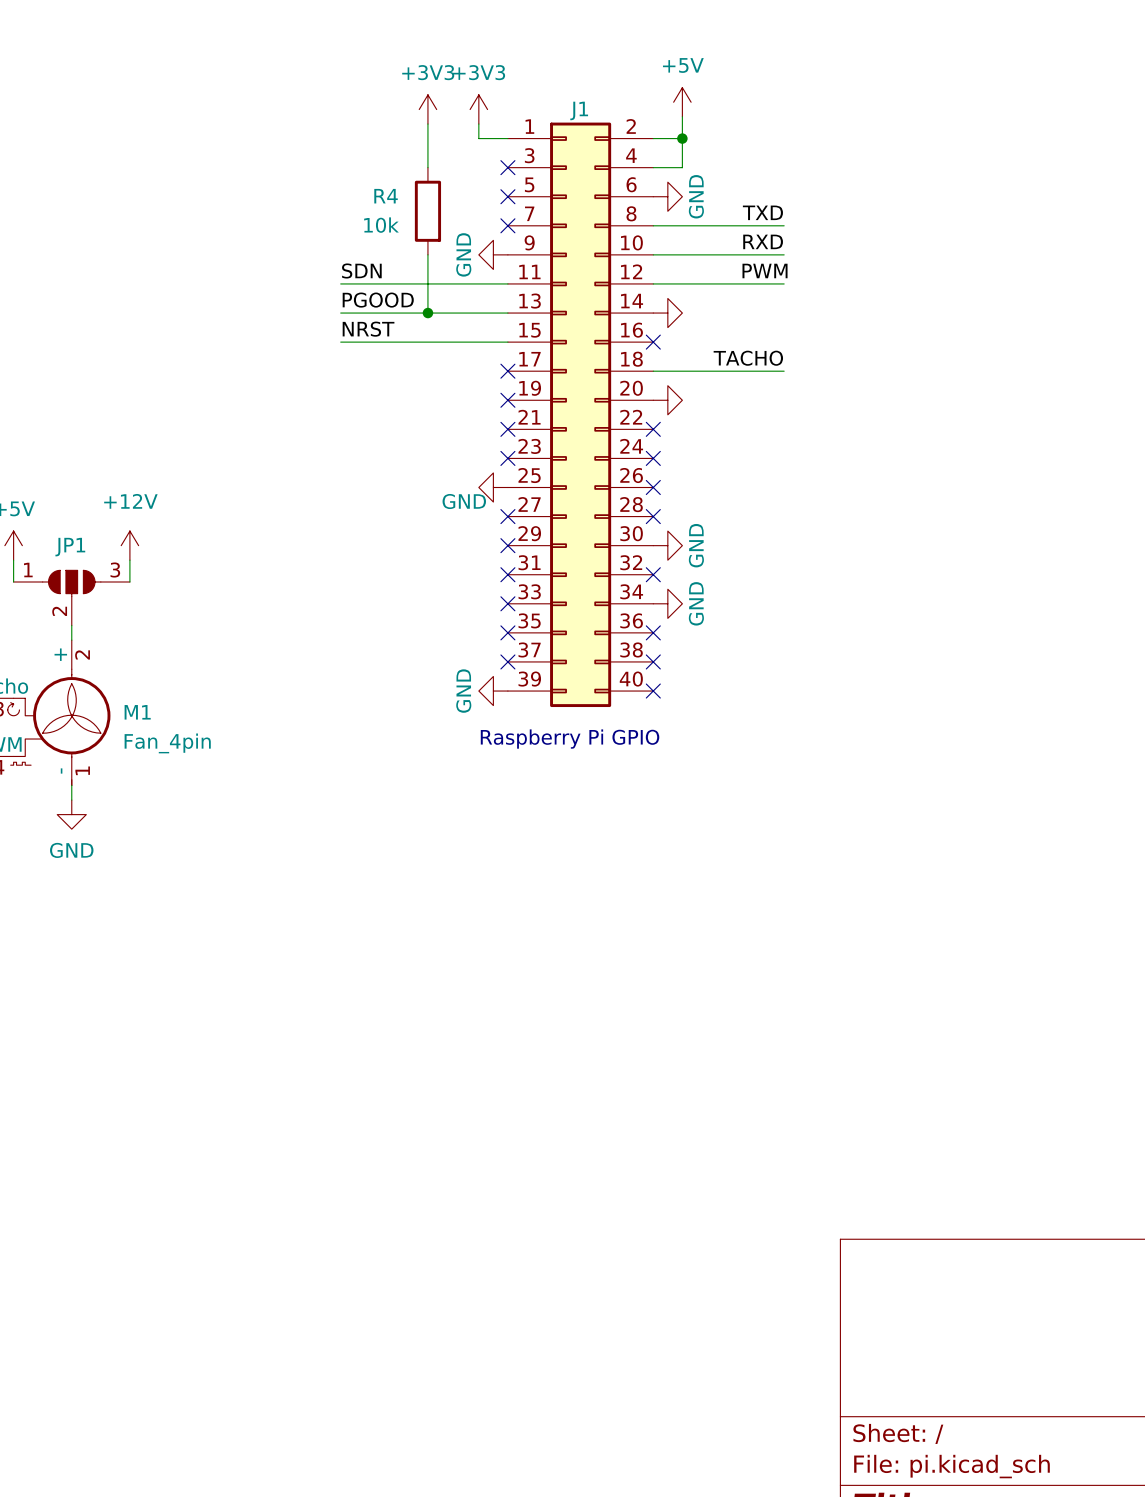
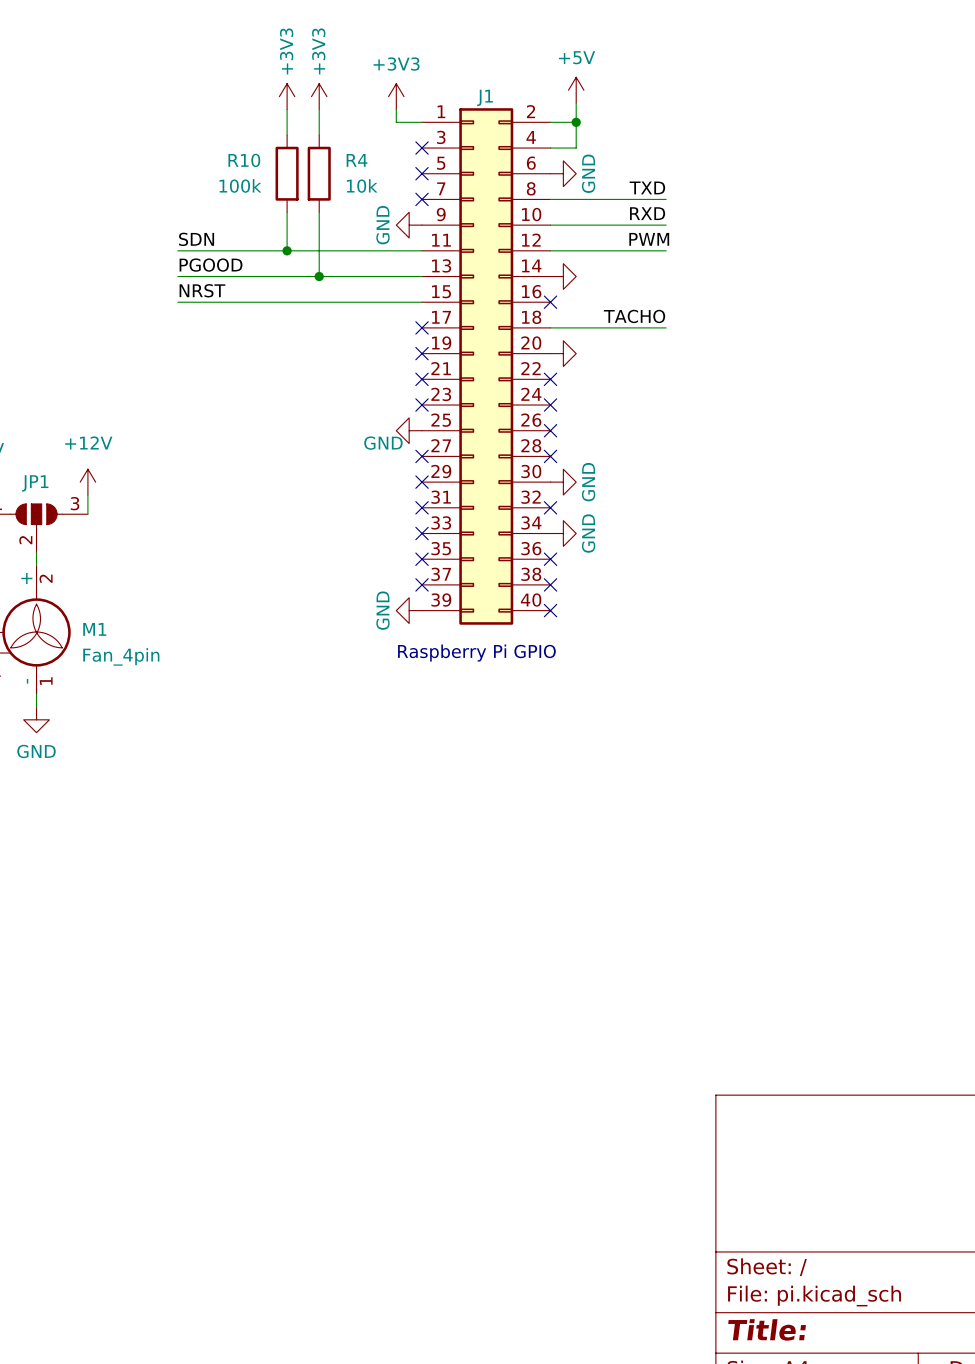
power symbol: none -> +3V3 (287, 96)
power symbol: none -> +3V3 (319, 96)
power symbol: +3V3 (427, 109) -> none
wire: none -> (287, 109) (287, 135)
wire: none -> (319, 109) (319, 135)
wire: (427, 124) (427, 167) -> (287, 212) (287, 250)
R10: none -> 100k (287, 173)
R4 name position: R4 (386, 196) -> R4 (357, 160)
R4 position: (427, 211) -> (319, 173)
R4 value position: 10k (381, 225) -> 10k (362, 185)
wire: none -> (319, 212) (319, 276)
wire: (427, 254) (427, 313) -> none
label position: SDN (361, 271) -> SDN (196, 239)
wire: none -> (177, 250) (274, 250)
junction: none -> (287, 250)
label position: PGOOD (378, 300) -> PGOOD (211, 265)
wire: none -> (177, 276) (274, 276)
junction position: (427, 313) -> (319, 276)
label position: NRST (368, 329) -> NRST (202, 290)
wire: none -> (177, 302) (274, 302)

